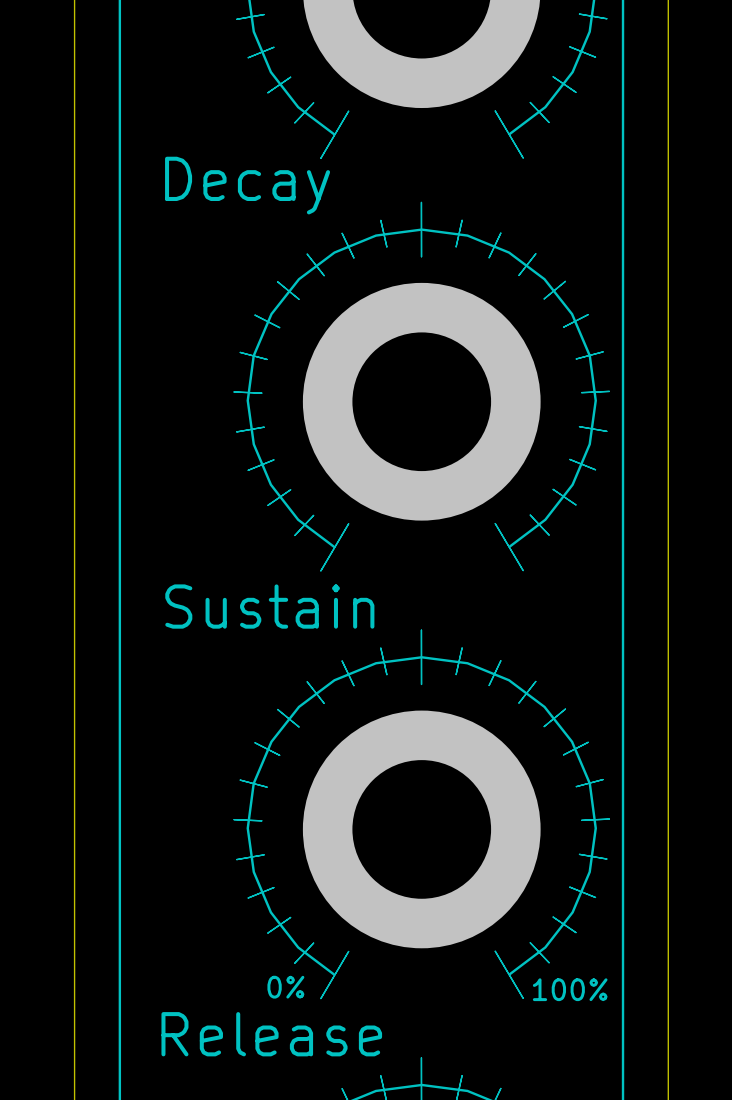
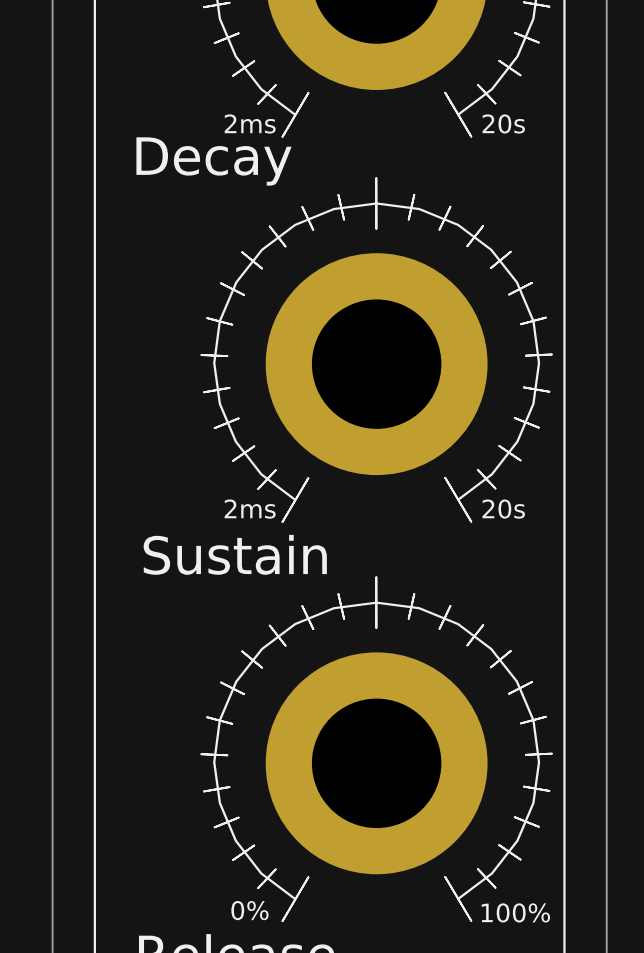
text: none -> 2ms (250, 123)
text: none -> 20s (503, 123)
text: none -> 2ms (250, 509)
text: none -> 20s (503, 509)

